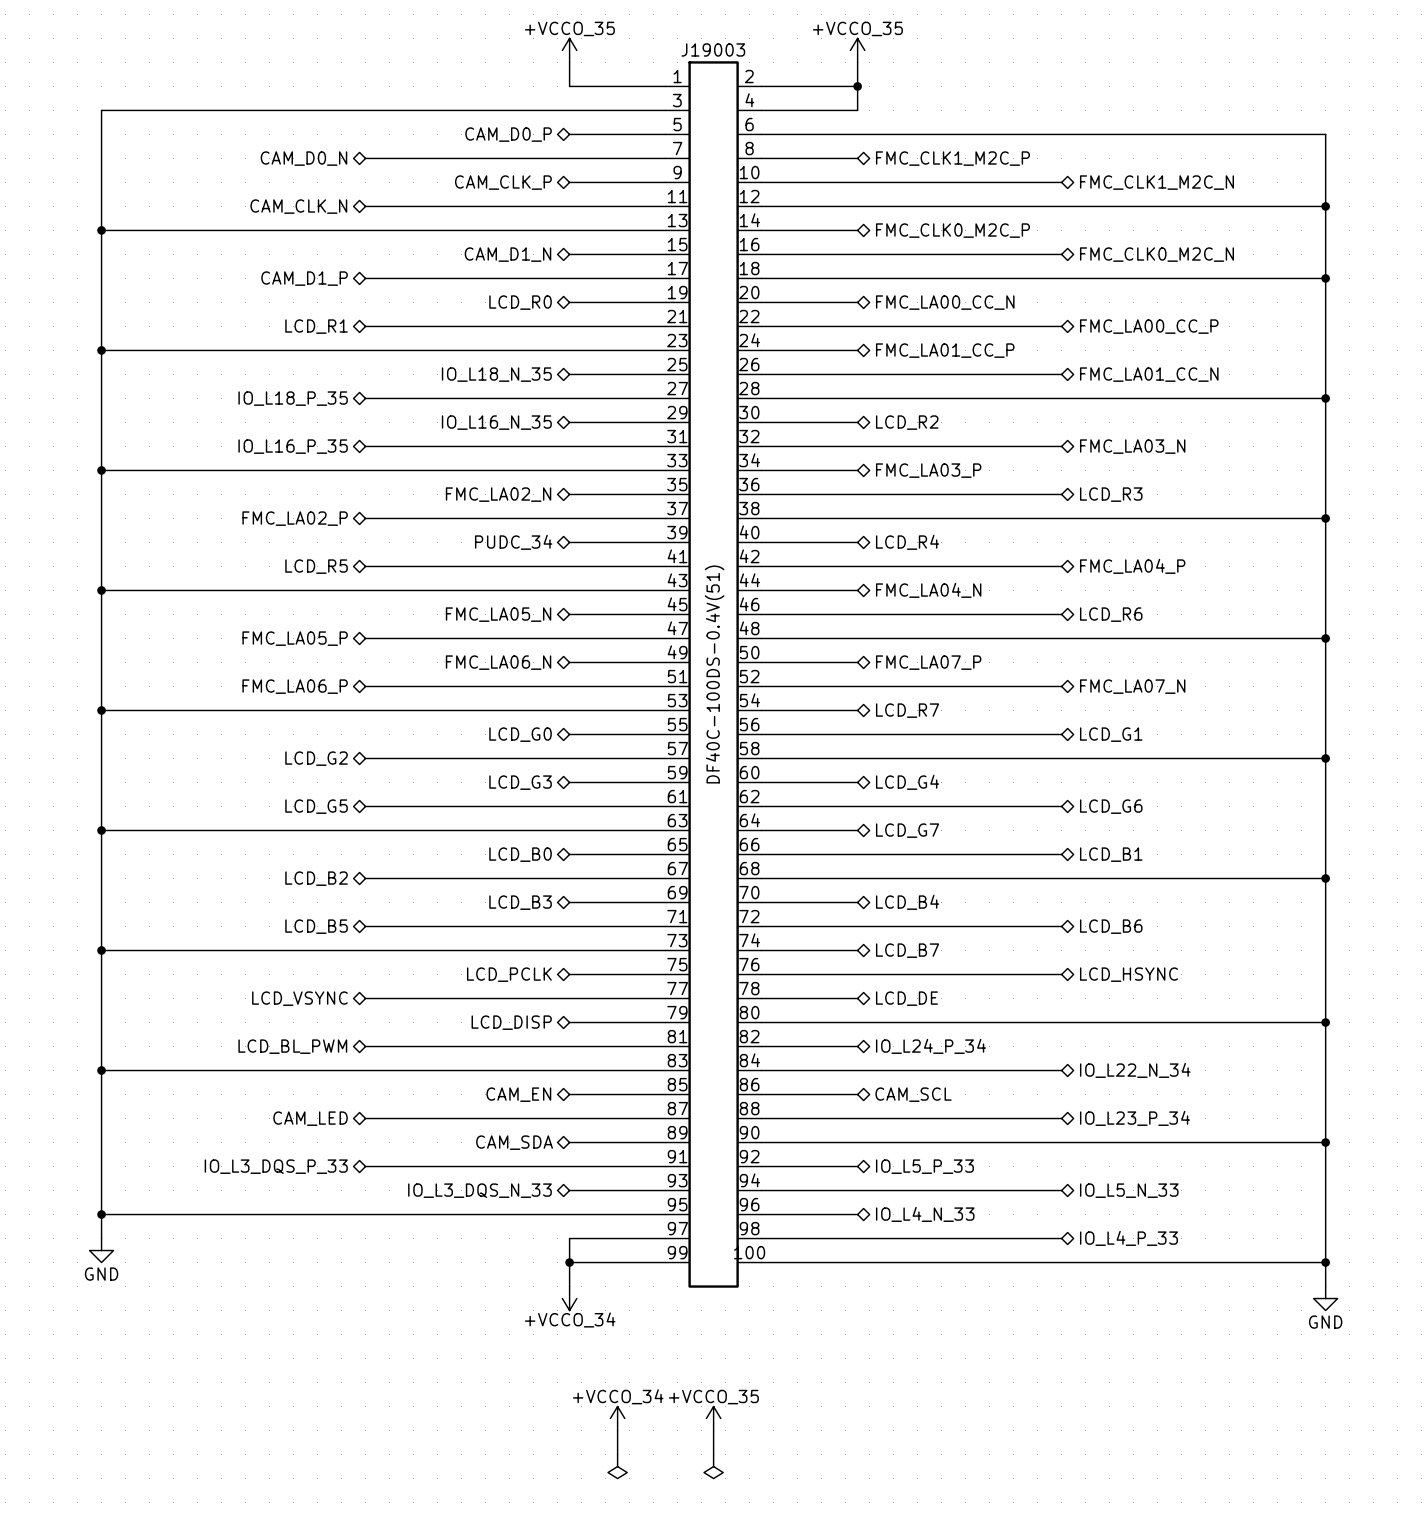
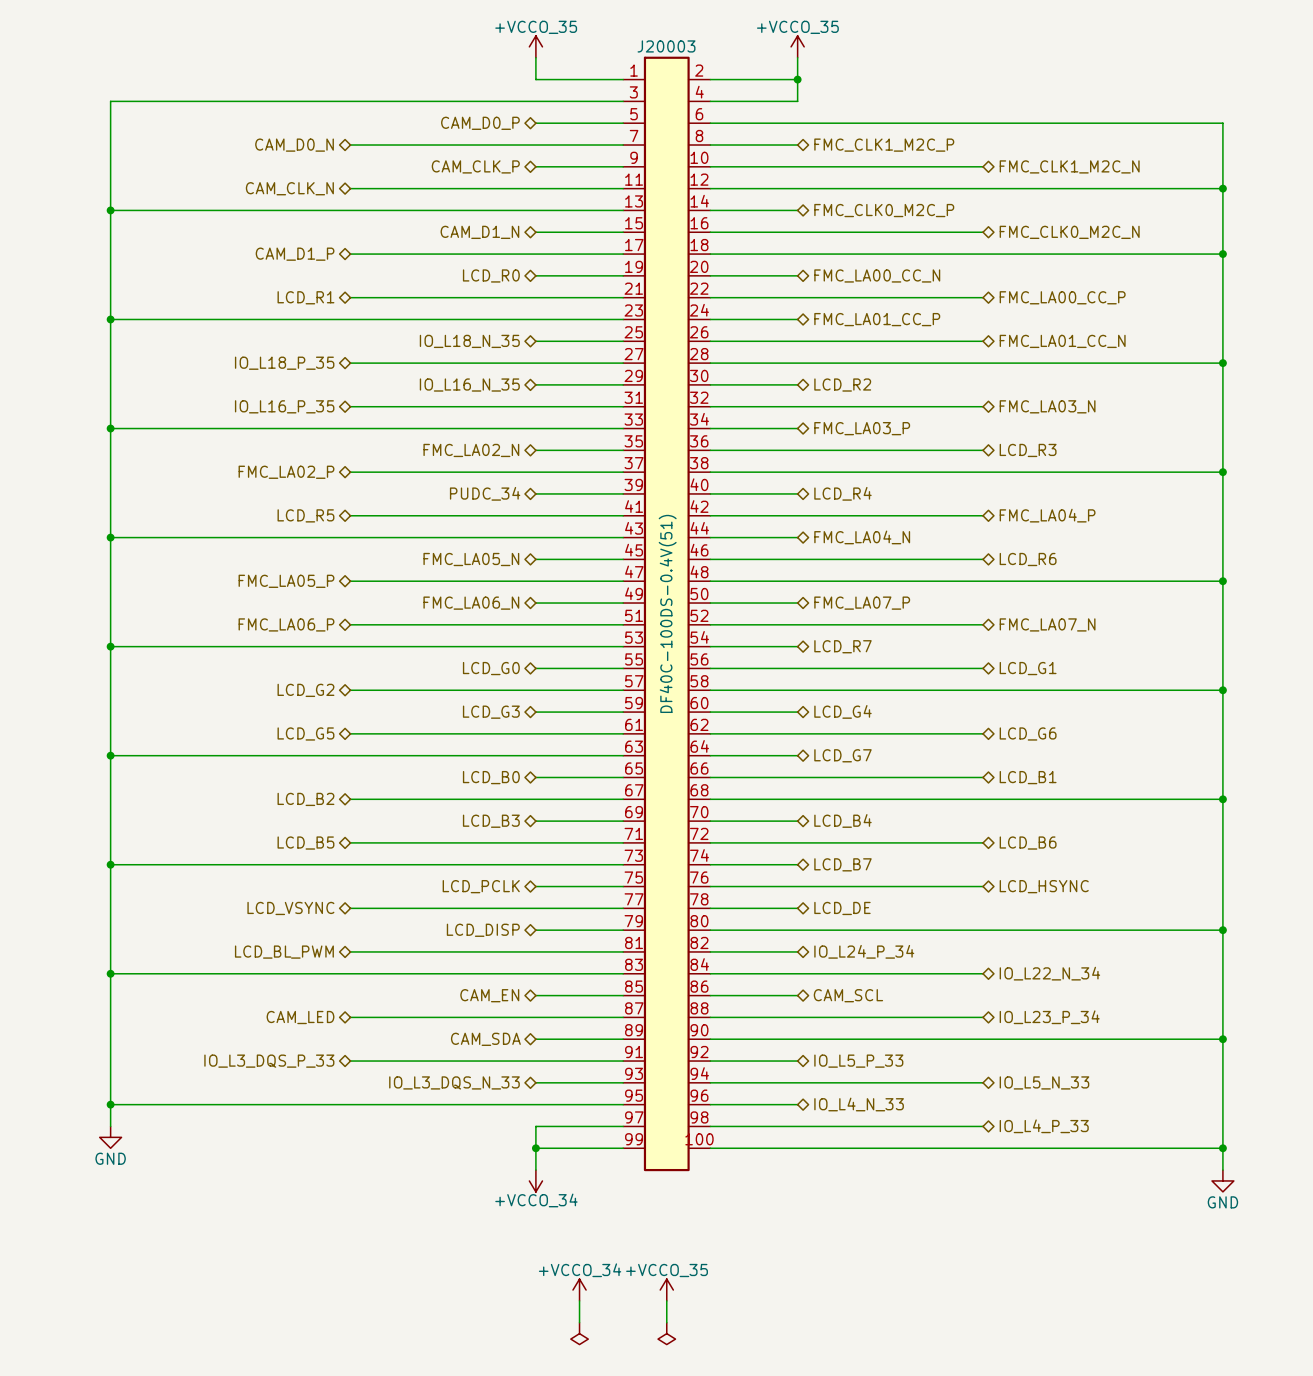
J19003 name: J19003 (713, 49) -> J20003 (666, 46)

